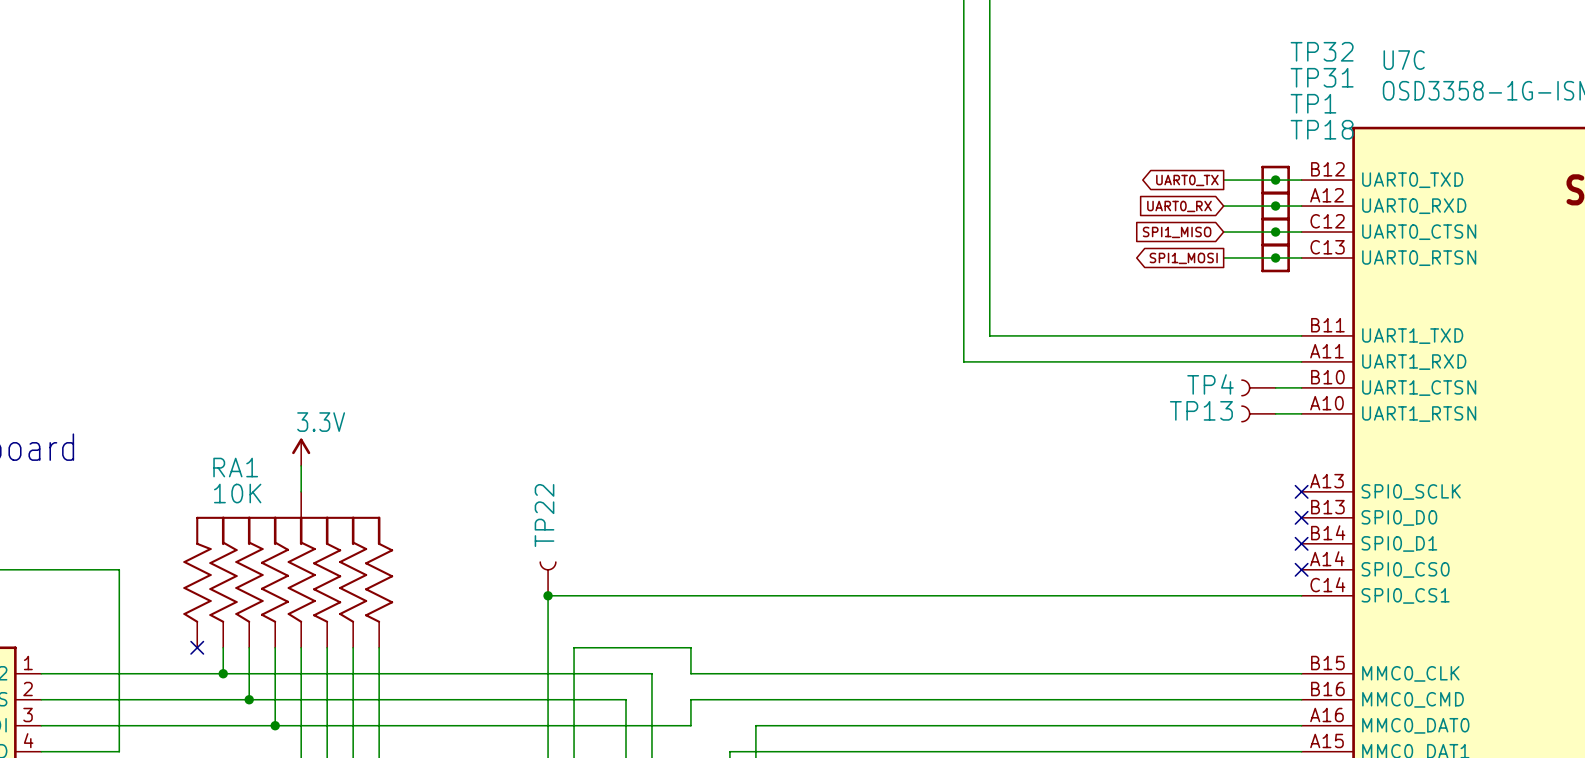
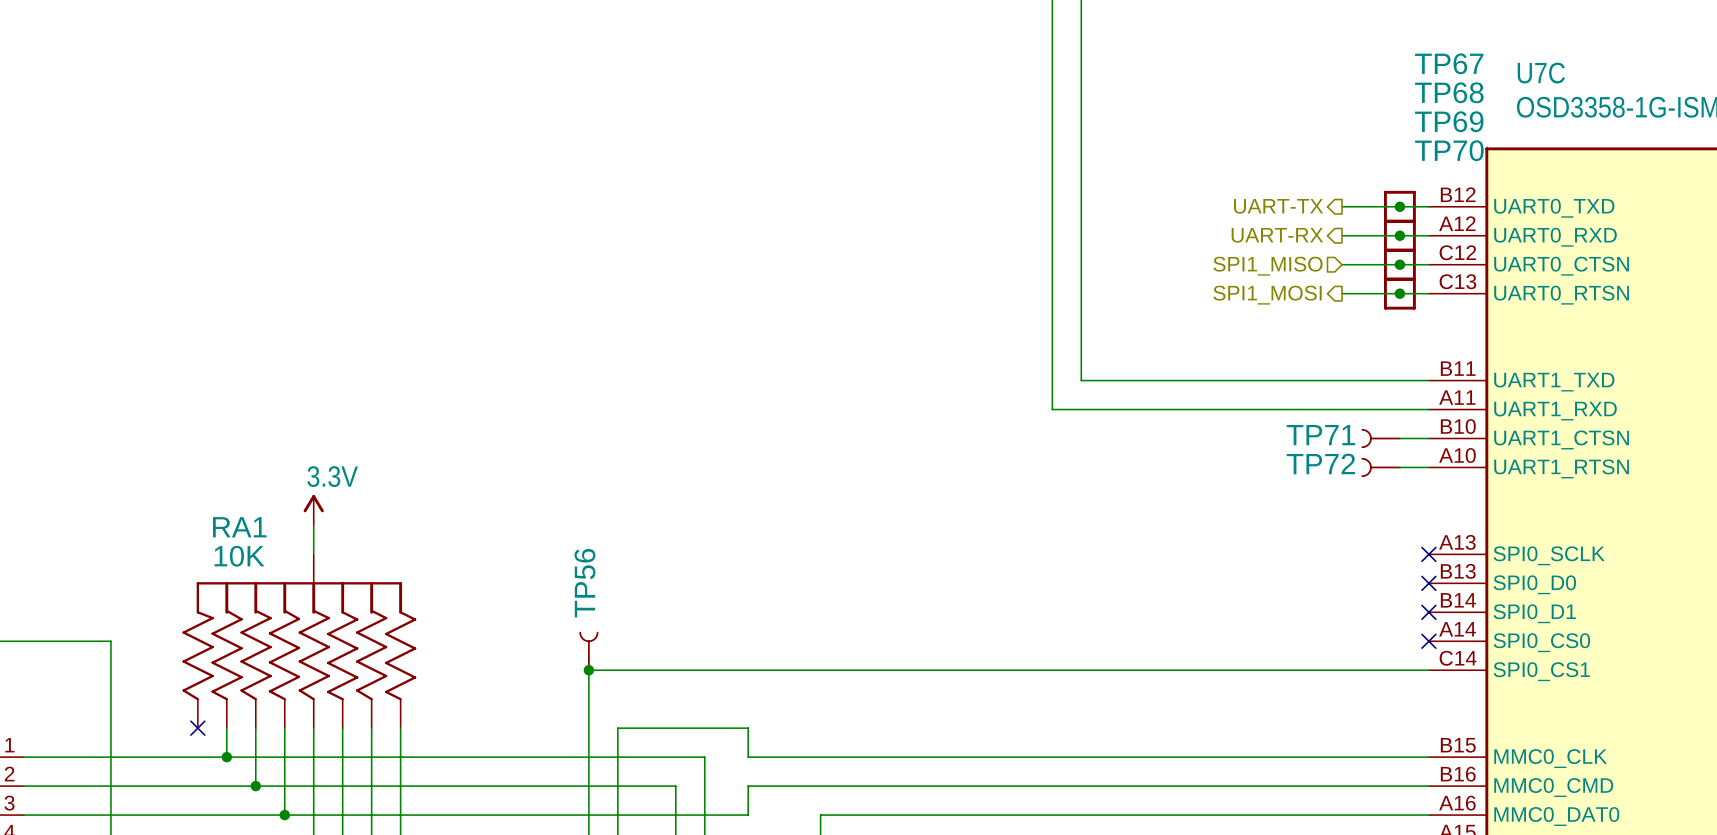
TP32 name: TP32 (1322, 51) -> TP67 (1449, 63)
TP31 name: TP31 (1322, 77) -> TP68 (1449, 92)
TP1 name: TP1 (1313, 103) -> TP69 (1449, 121)
TP18 name: TP18 (1322, 129) -> TP70 (1449, 150)
hierarchical label: none -> UART-TX (1278, 206)
global label: UART0_TX (1187, 180) -> none
hierarchical label: none -> UART-RX (1277, 235)
global label: UART0_RX (1179, 206) -> none
hierarchical label: none -> SPI1_MISO (1268, 266)
global label: SPI1_MISO (1177, 232) -> none
hierarchical label: none -> SPI1_MOSI (1267, 295)
global label: SPI1_MOSI (1183, 258) -> none
TP4 name: TP4 (1210, 384) -> TP71 (1320, 435)
TP13 name: TP13 (1201, 410) -> TP72 (1320, 463)
TP22 name: TP22 (544, 515) -> TP56 (584, 583)

